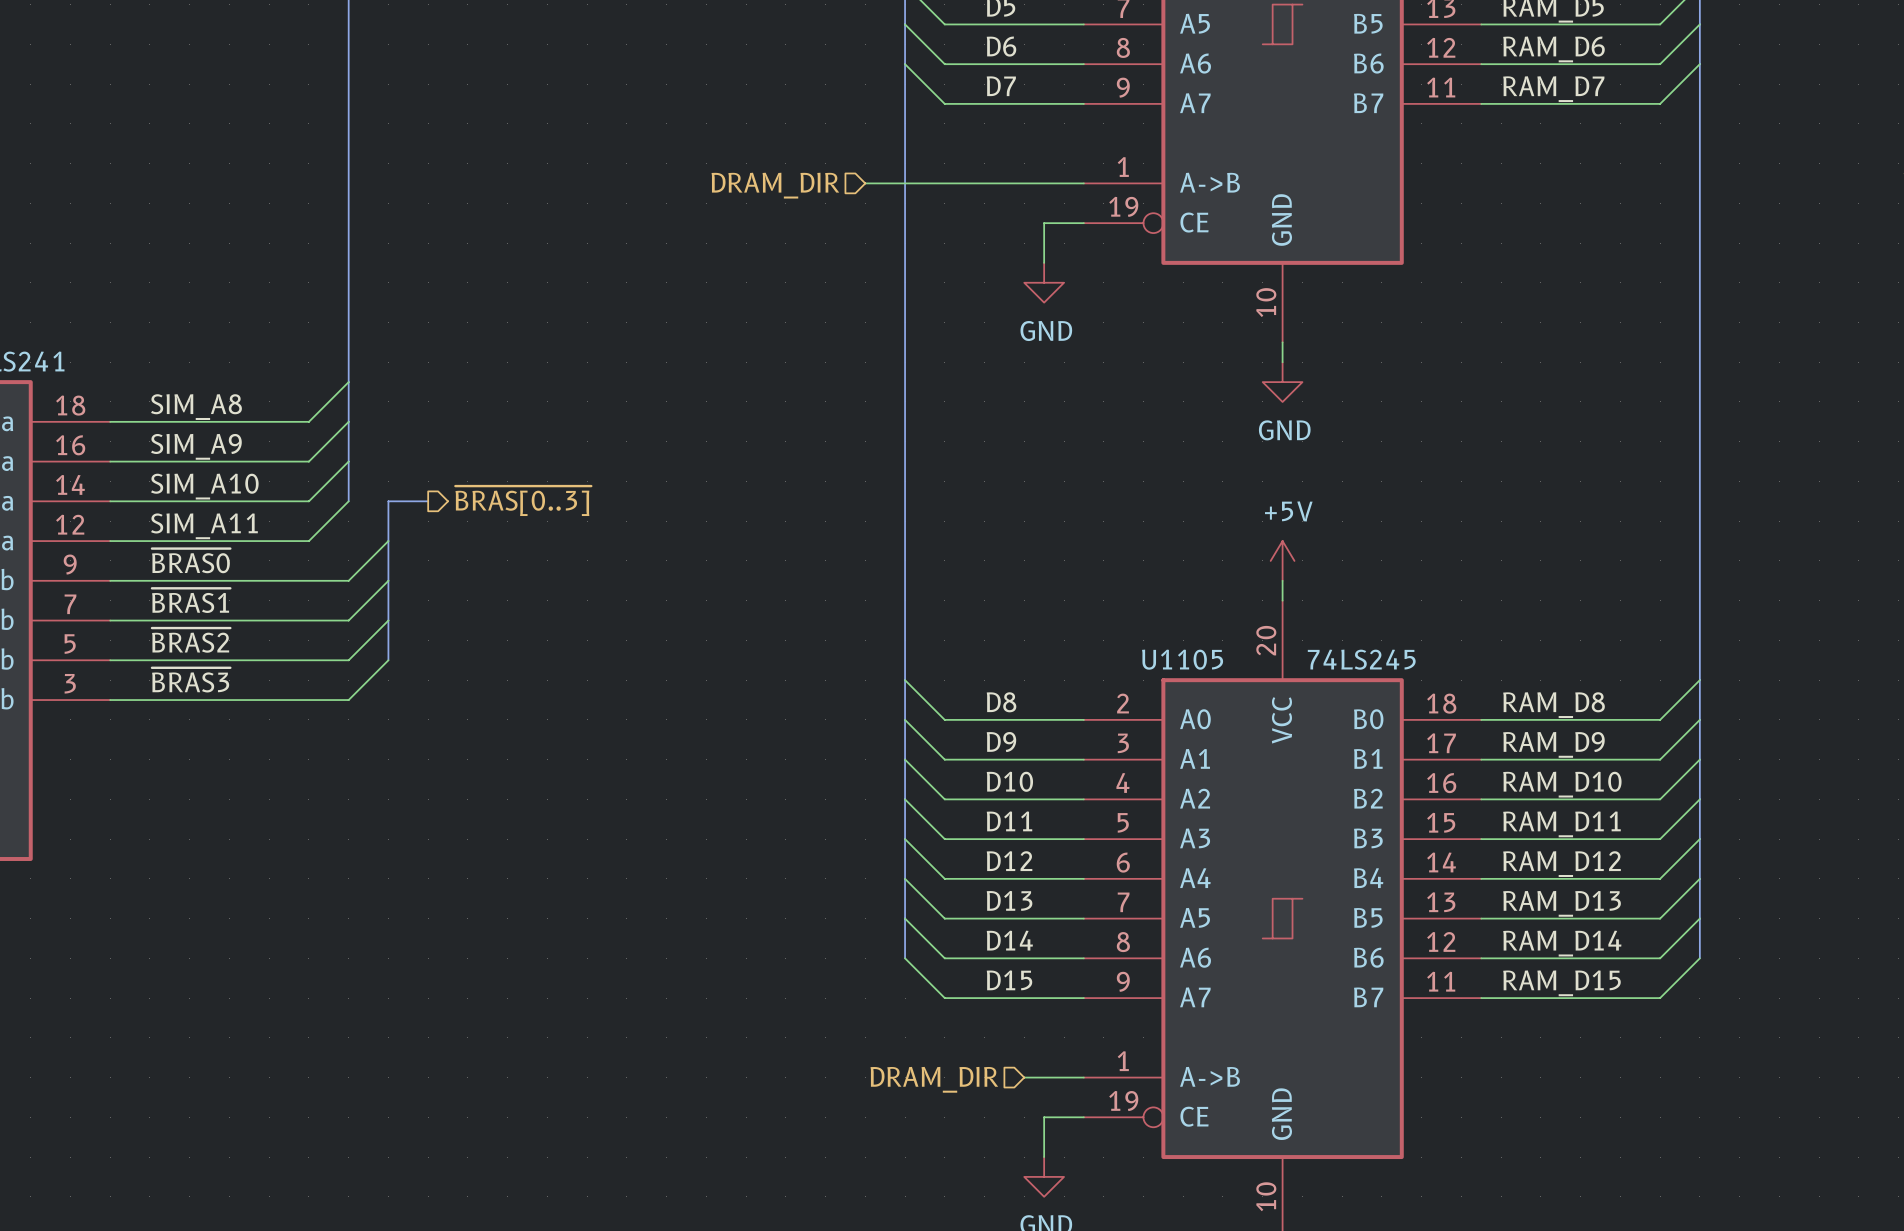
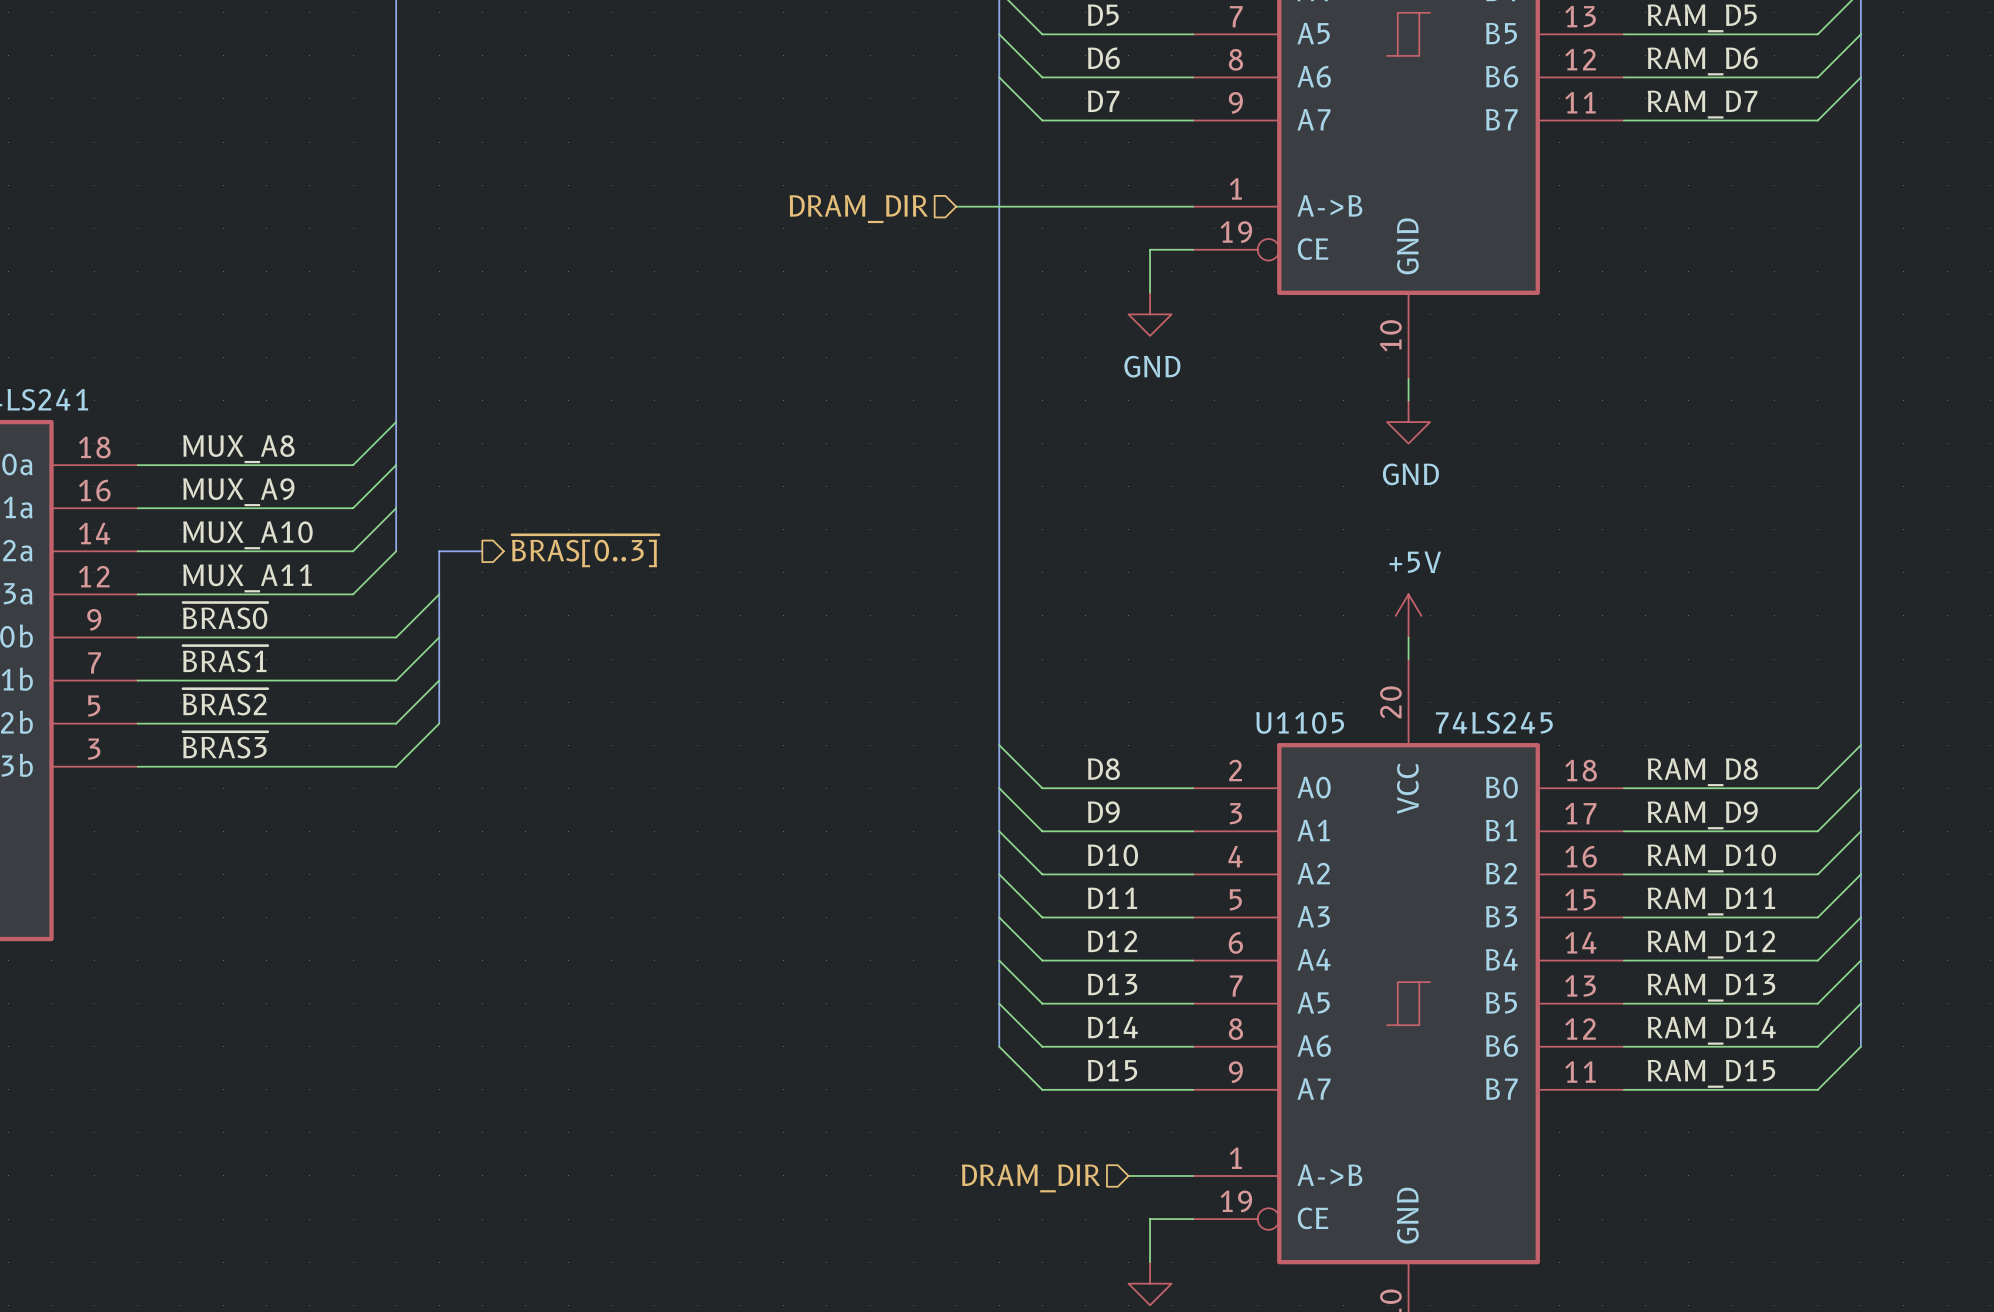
label: SIM_A8 (196, 407) -> MUX_A8 (238, 449)
label: SIM_A9 (196, 446) -> MUX_A9 (238, 492)
label: SIM_A10 (204, 486) -> MUX_A10 (247, 535)
label: SIM_A11 (204, 526) -> MUX_A11 (247, 578)

